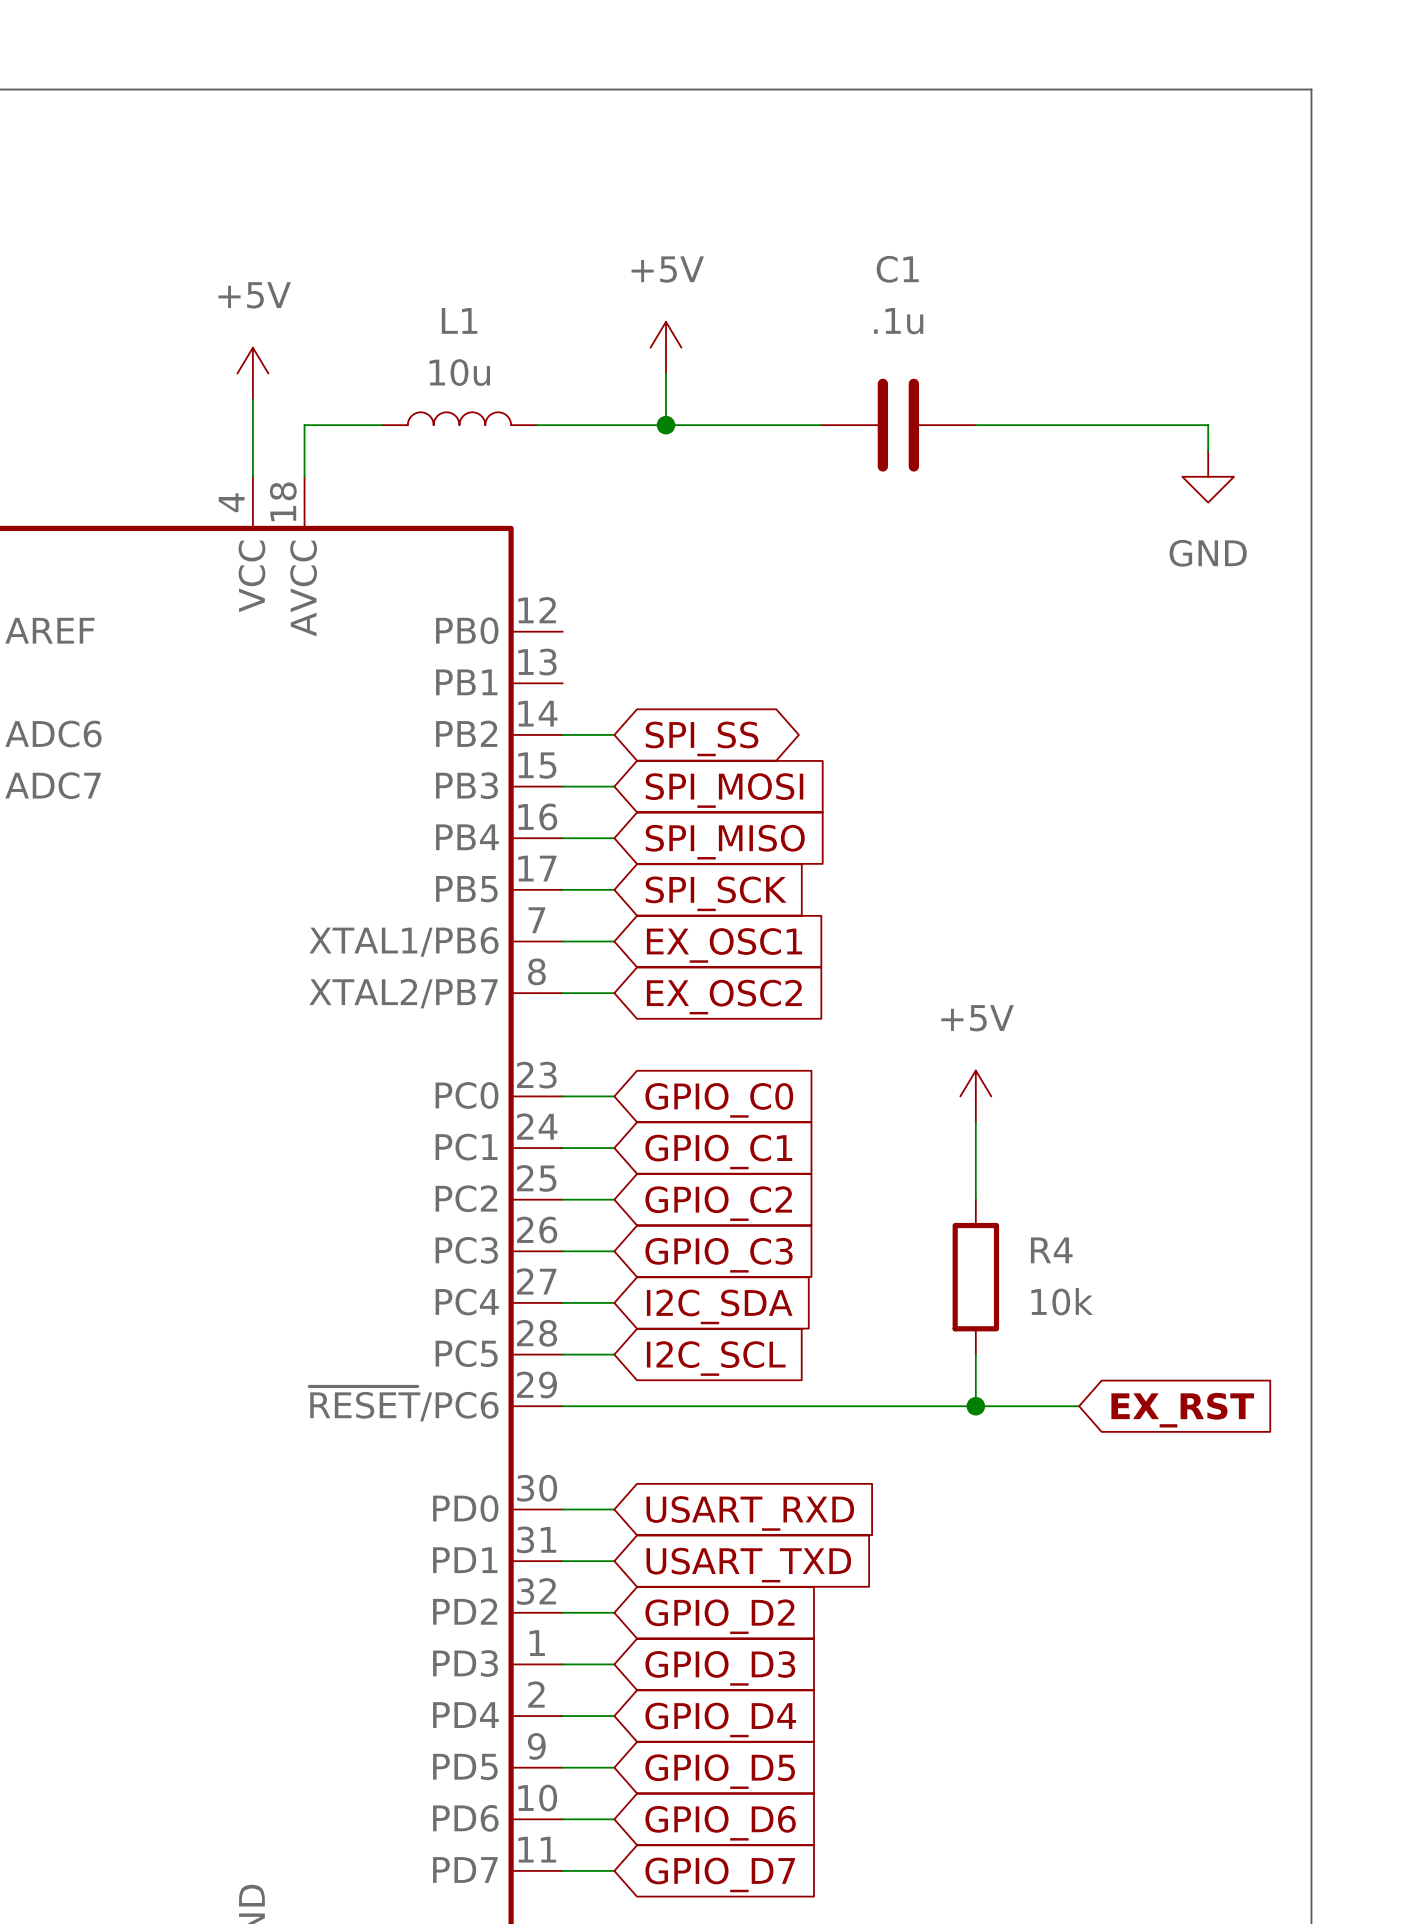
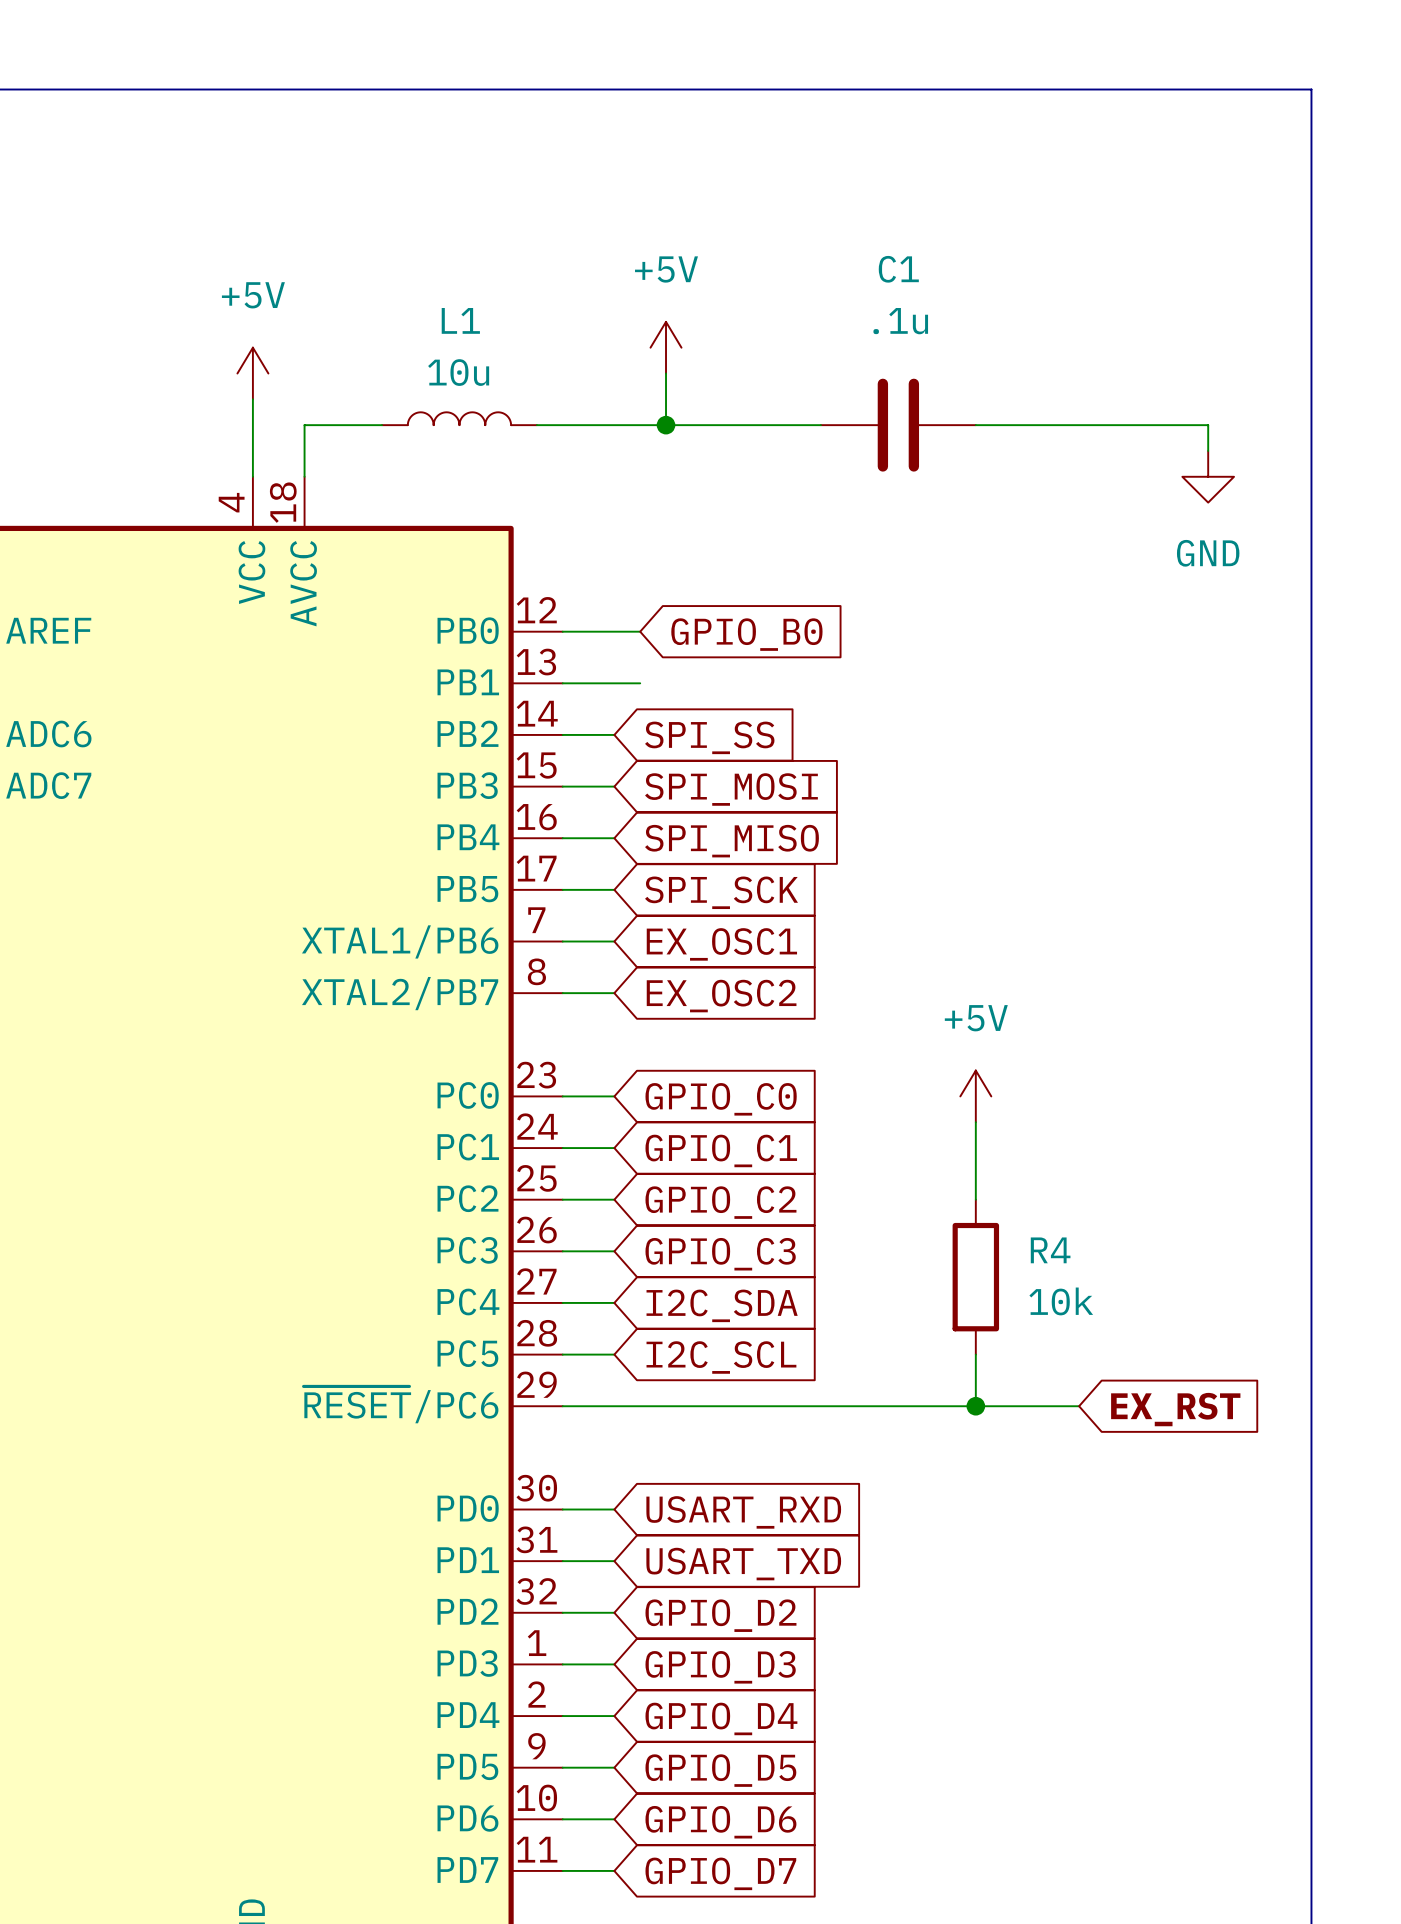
wire: none -> (562, 631) (640, 631)
global label: none -> GPIO_B0 (746, 634)
wire: none -> (562, 683) (640, 683)
global label shape: bidirectional (702, 738) -> input (709, 737)

